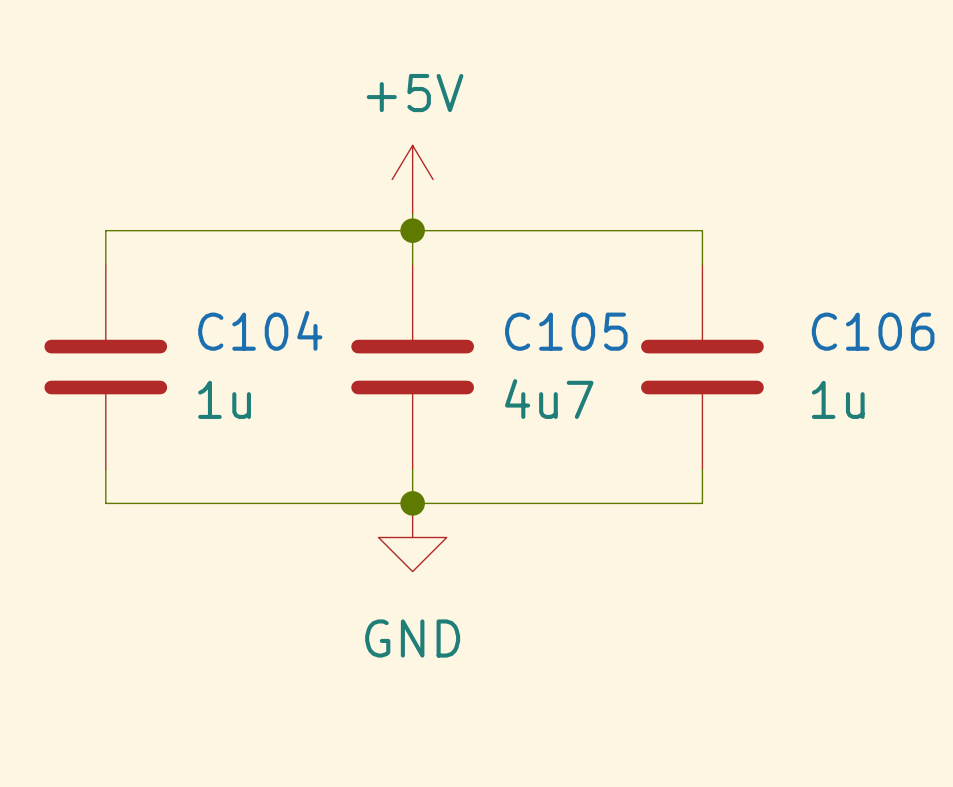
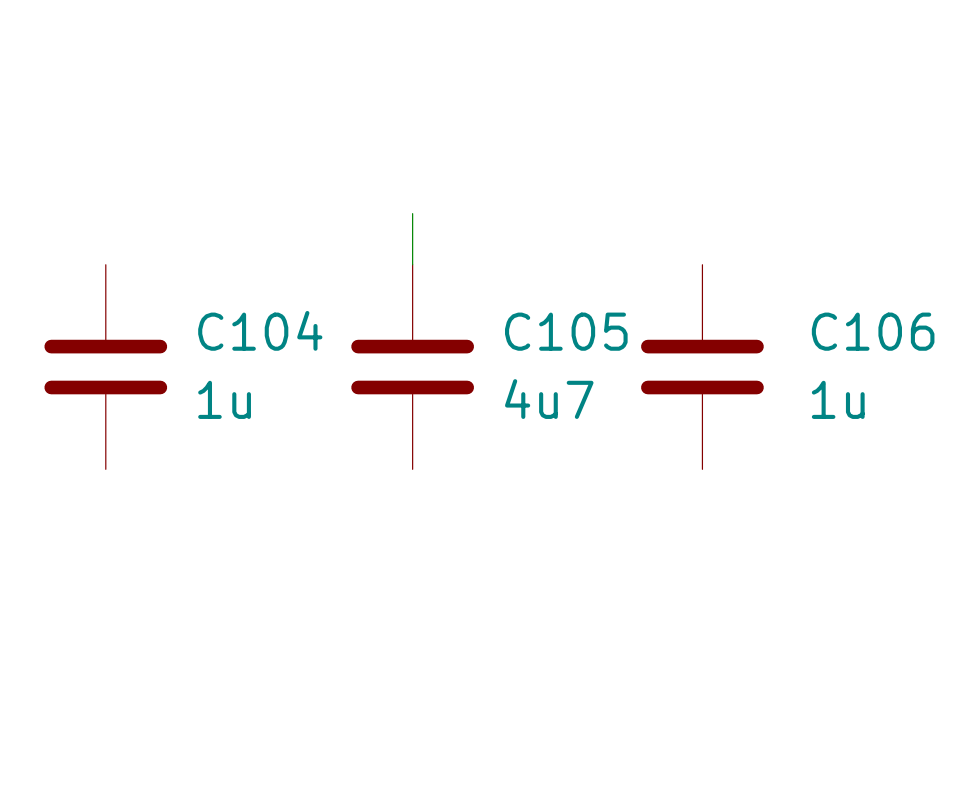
power symbol: +5V (412, 179) -> none
junction: (412, 230) -> none
wire: (105, 264) (105, 230) (702, 230) (702, 264) -> none
wire: (105, 469) (105, 503) (702, 503) (702, 469) -> none
wire: (412, 469) (412, 503) -> none
junction: (412, 503) -> none
power symbol: GND (412, 537) -> none

